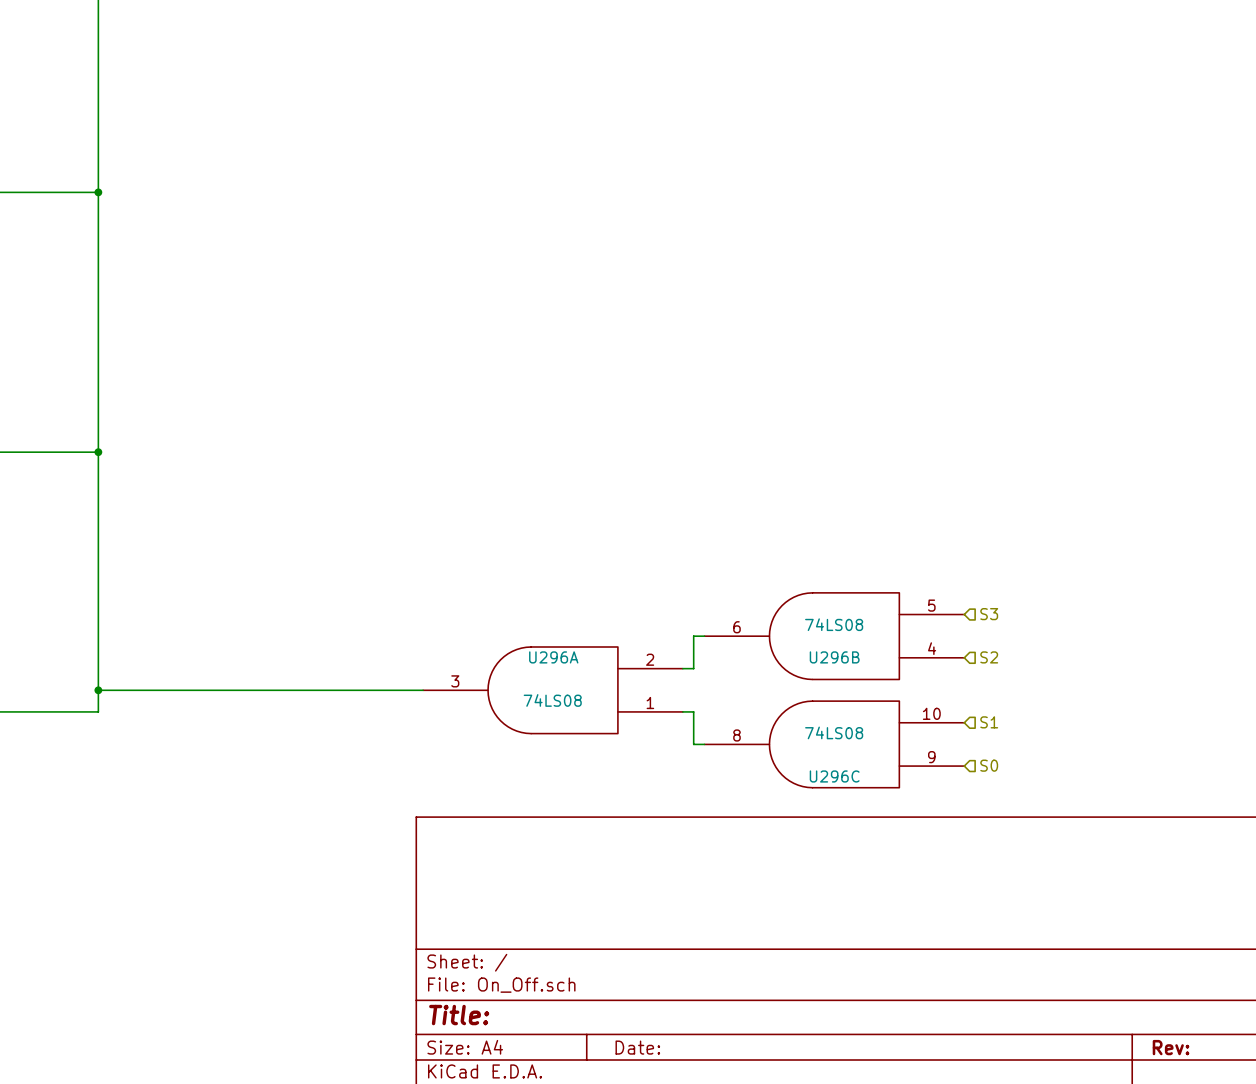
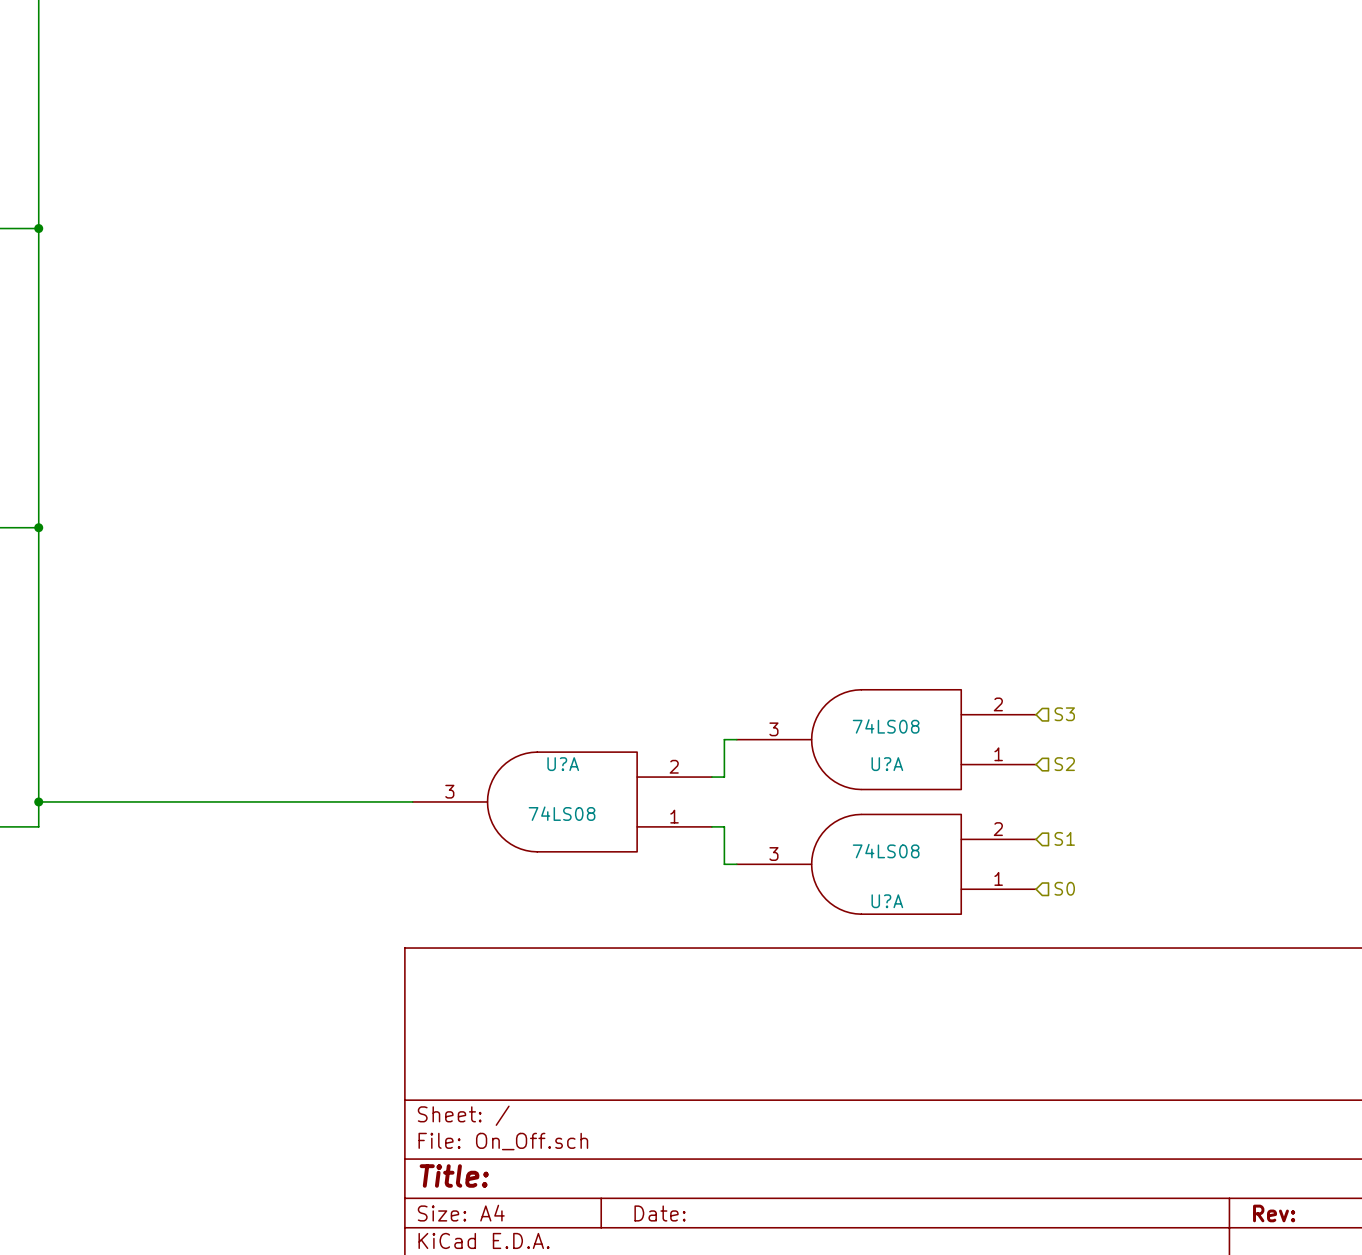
U296B pin number: 5 (931, 605) -> 2 (998, 704)
U296B pin number: 6 (736, 627) -> 3 (773, 729)
U296B pin number: 4 (932, 648) -> 1 (998, 754)
U296A name: U296A (553, 657) -> U?A (563, 764)
U296B name: U296B (834, 657) -> U?A (887, 764)
U296C pin number: 10 (931, 713) -> 2 (998, 829)
U296C pin number: 8 (736, 735) -> 3 (773, 854)
U296C pin number: 9 (931, 757) -> 1 (998, 878)
U296C name: U296C (834, 776) -> U?A (887, 901)

